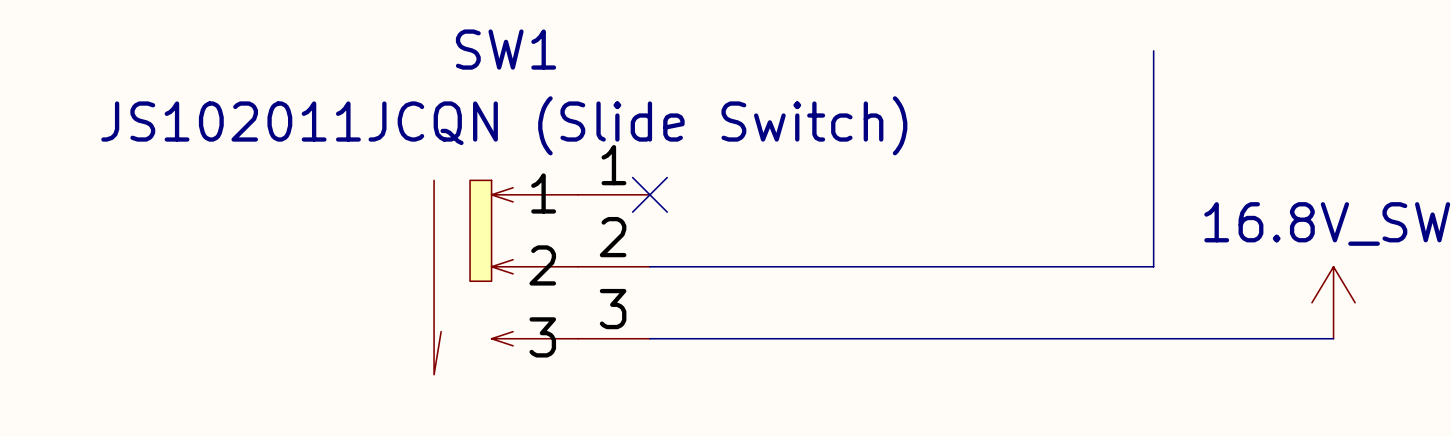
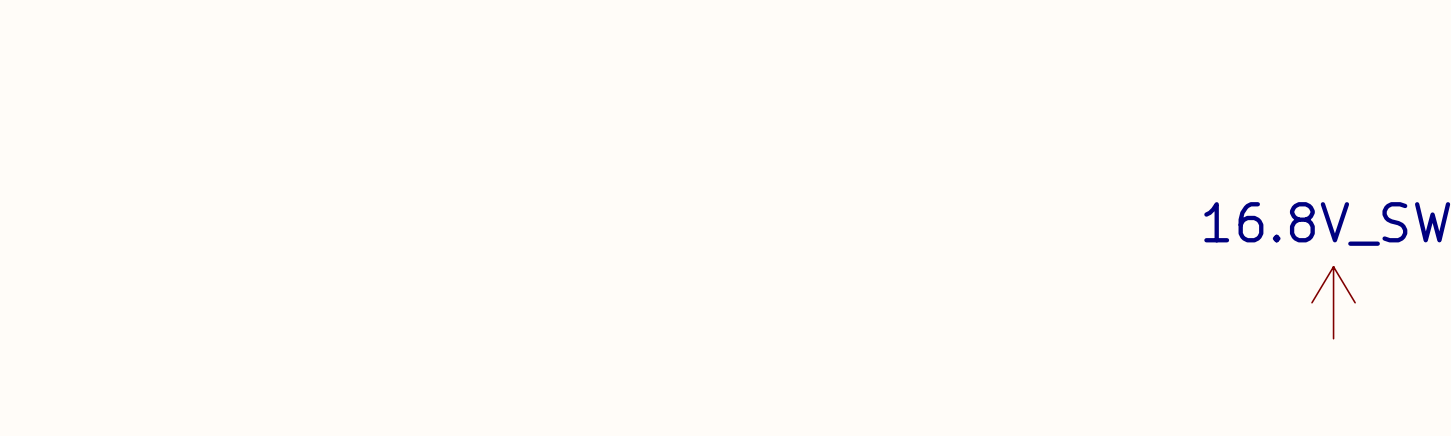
wire: (1153, 50) (1153, 266) (649, 266) -> none
no-connect mark: (649, 194) -> none
SW1: JS102011JCQN (Slide Switch) (542, 277) -> none
wire: (649, 338) (1333, 338) -> none

